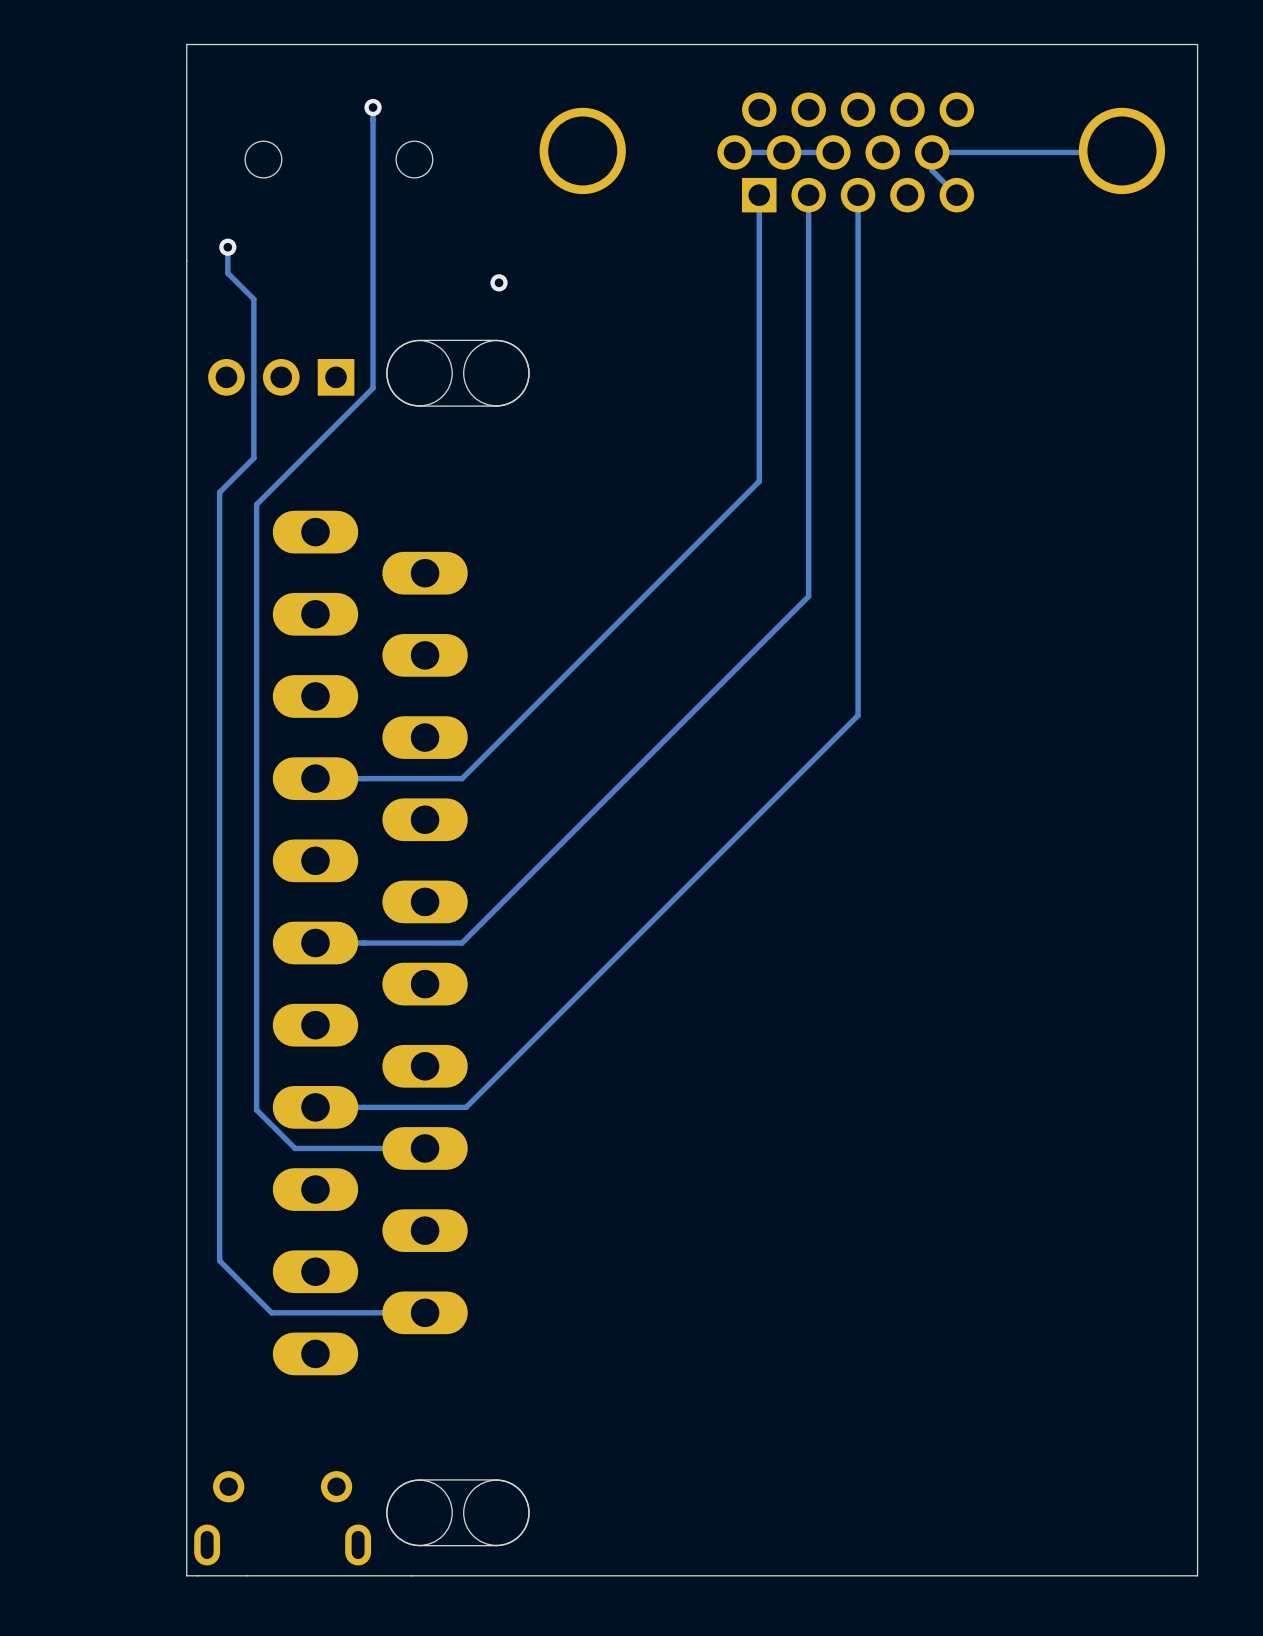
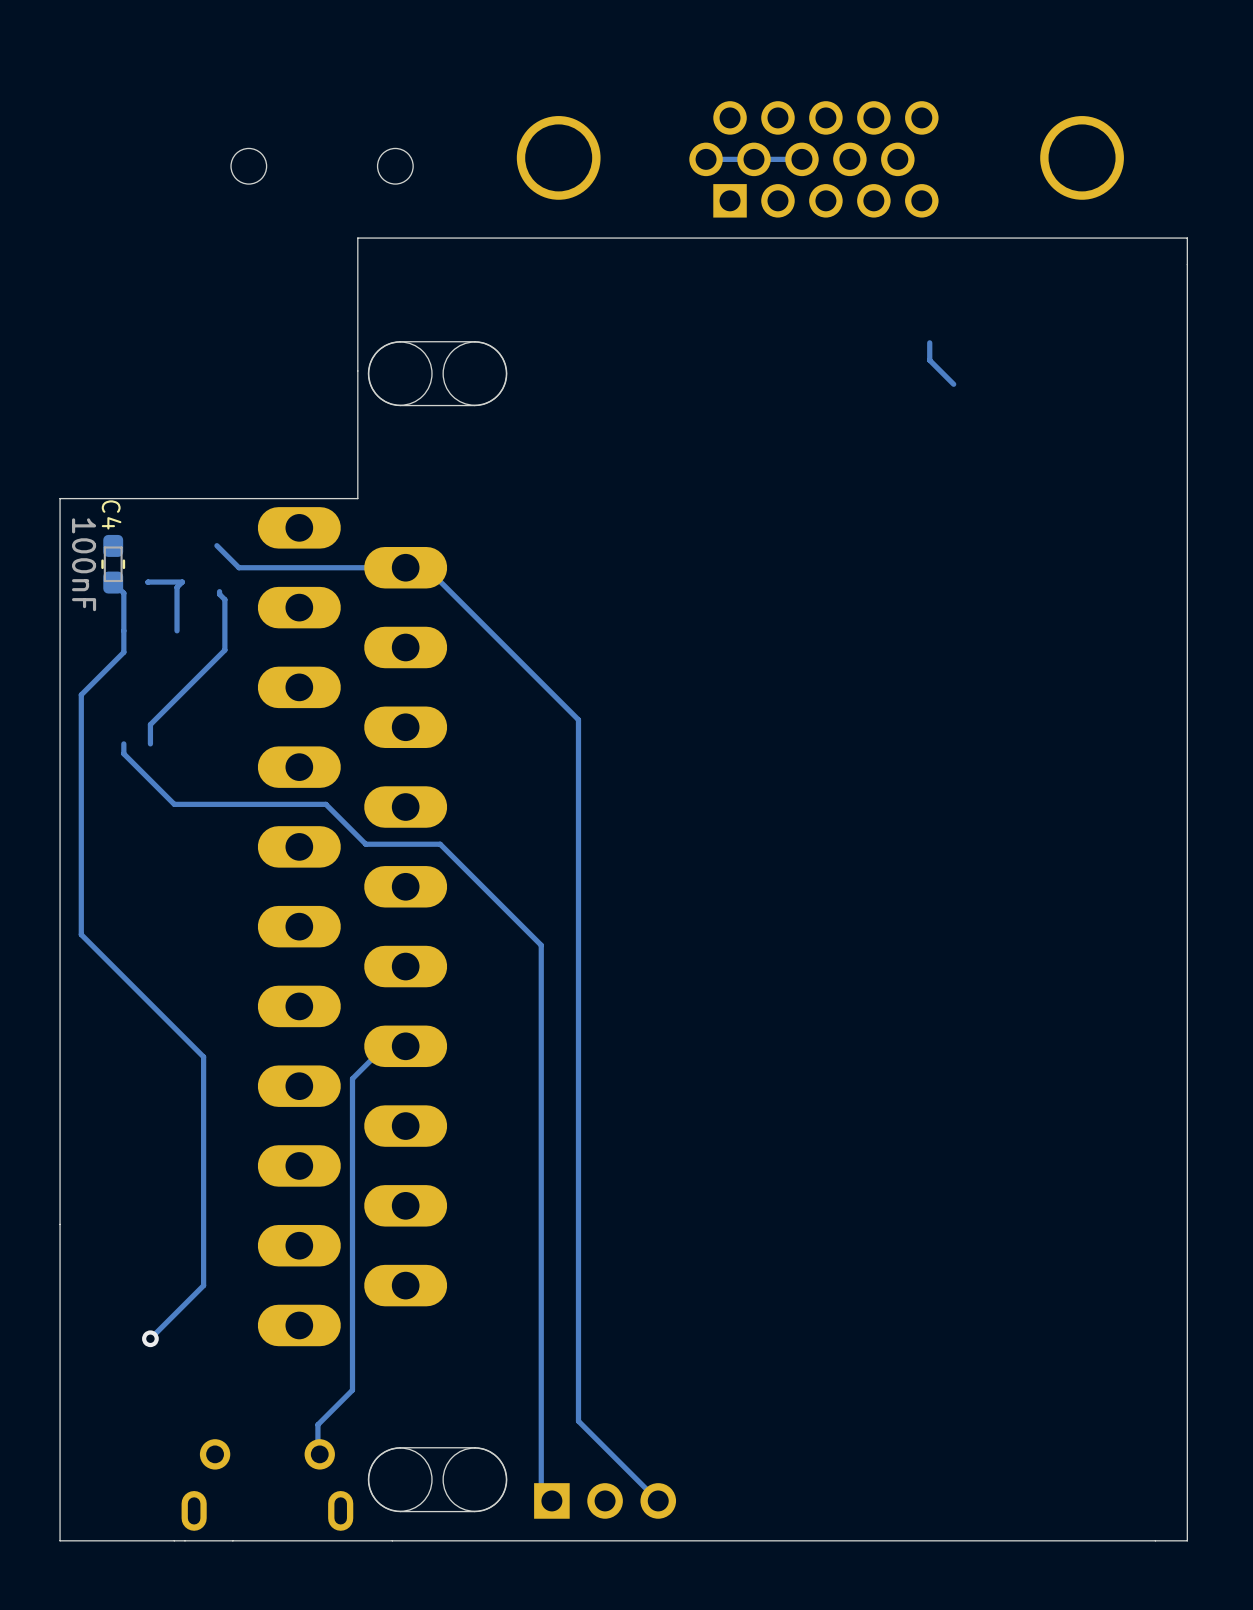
track: (373, 107) (373, 388) (256, 504) (256, 1109) (295, 1148) (425, 1148) -> none
via: (373, 107) -> none
track: (1121, 150) (932, 152) (932, 170) (956, 195) -> none
track: (759, 195) (759, 481) (462, 778) (315, 778) -> none
track: (808, 195) (808, 596) (462, 943) (315, 943) -> none
track: (858, 195) (858, 715) (466, 1107) (315, 1107) -> none
track: (227, 247) (227, 273) (253, 299) (253, 458) (219, 492) (219, 1260) (271, 1312) (425, 1312) -> none
via: (227, 247) -> none
via: (499, 282) -> none
track: none -> (929, 342) (929, 360) (953, 384)
part: (281, 377) -> none
track: none -> (216, 545) (238, 567) (426, 567) (578, 719) (578, 1421) (658, 1500)
C4: none -> 100nF (113, 564)
track: none -> (148, 582) (182, 582) (177, 587) (177, 630)
track: none -> (113, 582) (123, 593) (123, 652) (81, 694) (81, 934) (203, 1056) (203, 1285) (150, 1338)
track: none -> (219, 591) (224, 599) (224, 650) (150, 724) (150, 743)
track: none -> (123, 743) (123, 753) (174, 804) (325, 804) (365, 844) (440, 844) (541, 945) (541, 1490) (551, 1500)
track: none -> (405, 1046) (384, 1046) (352, 1078) (352, 1390) (317, 1424) (317, 1447)
via: none -> (150, 1338)
part: none -> (605, 1500)
board edge: (1197, 1575) (1197, 44) (186, 44) (186, 1575) -> (1155, 1540) (1187, 1540) (1187, 238) (357, 238) (357, 498) (60, 498) (60, 1540) (174, 1540)

